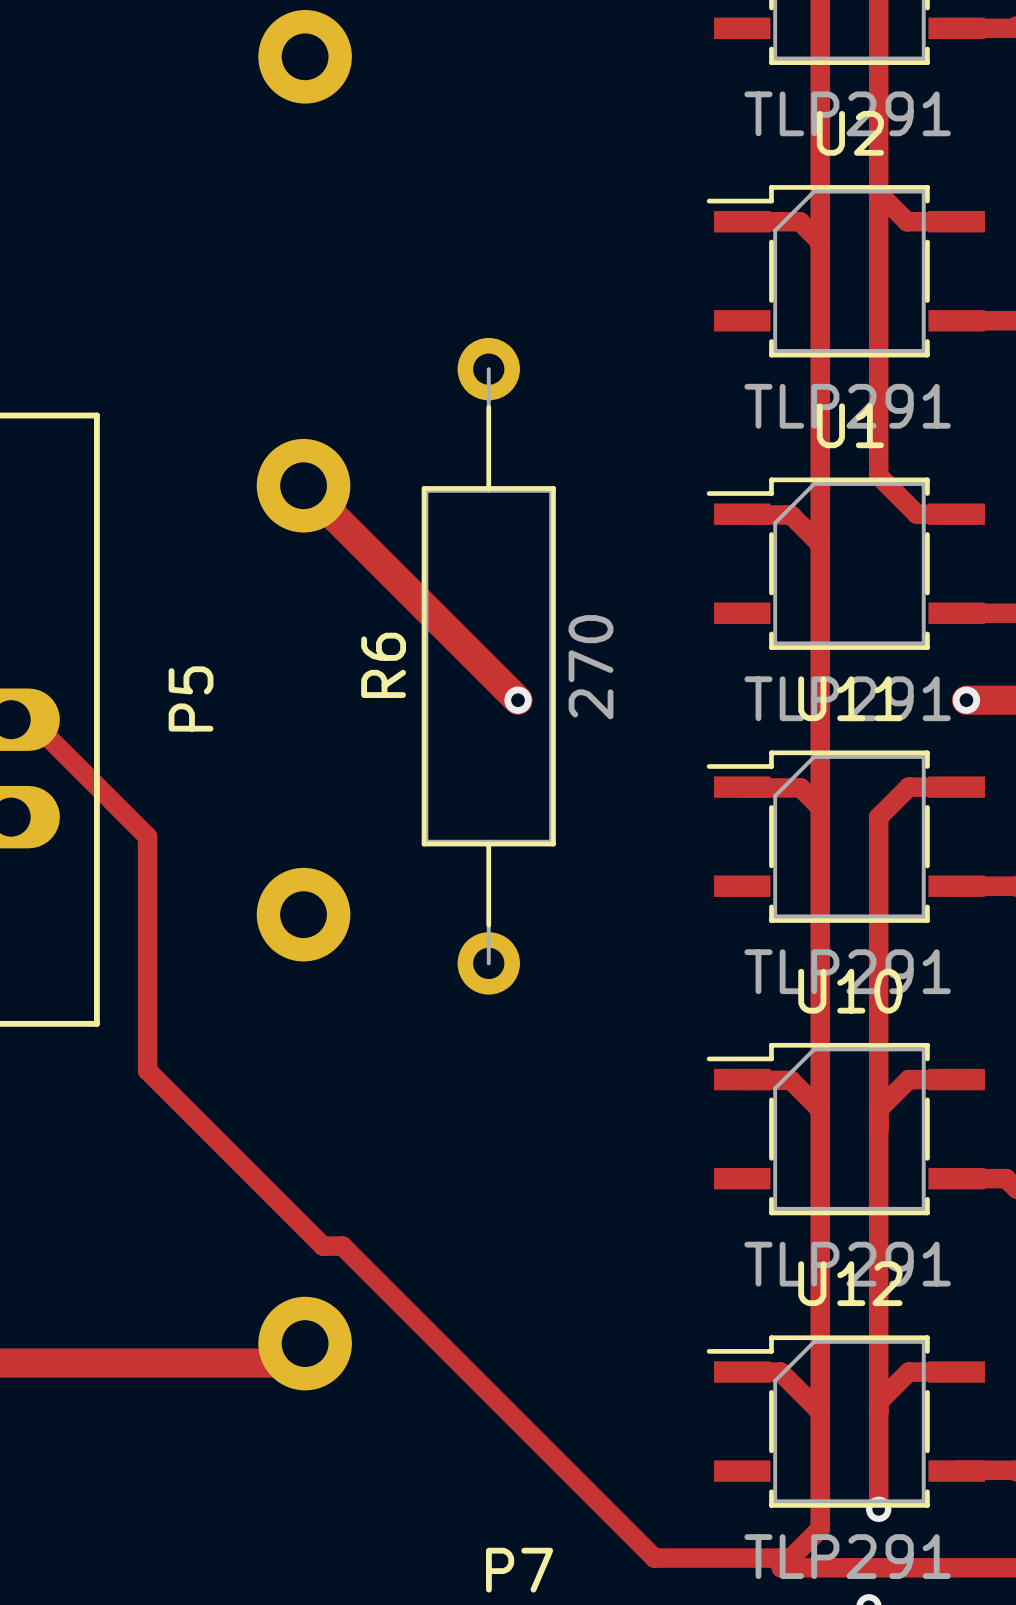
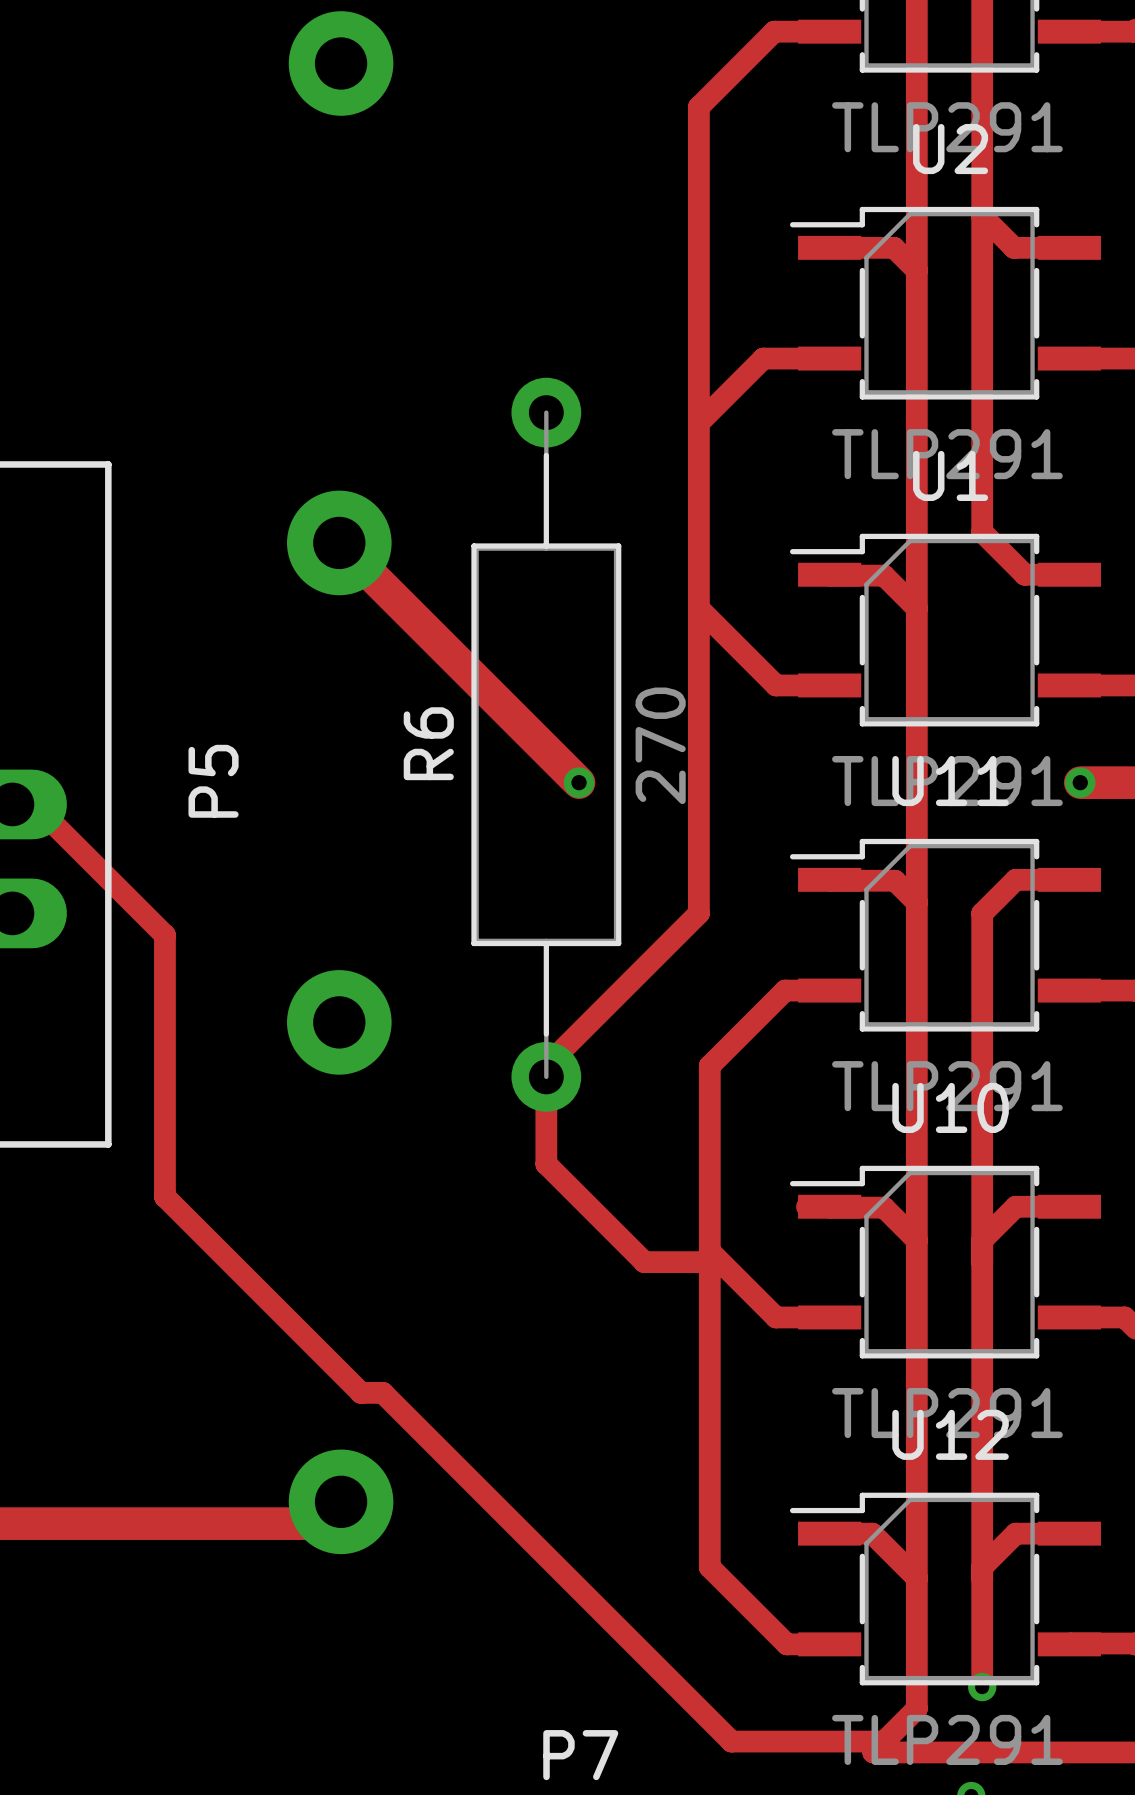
track: none -> (829, 31) (774, 31) (698, 107) (698, 913) (546, 1065) (546, 1164) (644, 1262) (709, 1262)
track: none -> (829, 358) (763, 358) (698, 423)
track: none -> (698, 608) (776, 685) (829, 685)
track: none -> (829, 990) (785, 990) (709, 1065) (709, 1567) (786, 1644) (829, 1644)
track: none -> (709, 1251) (776, 1317) (829, 1317)

